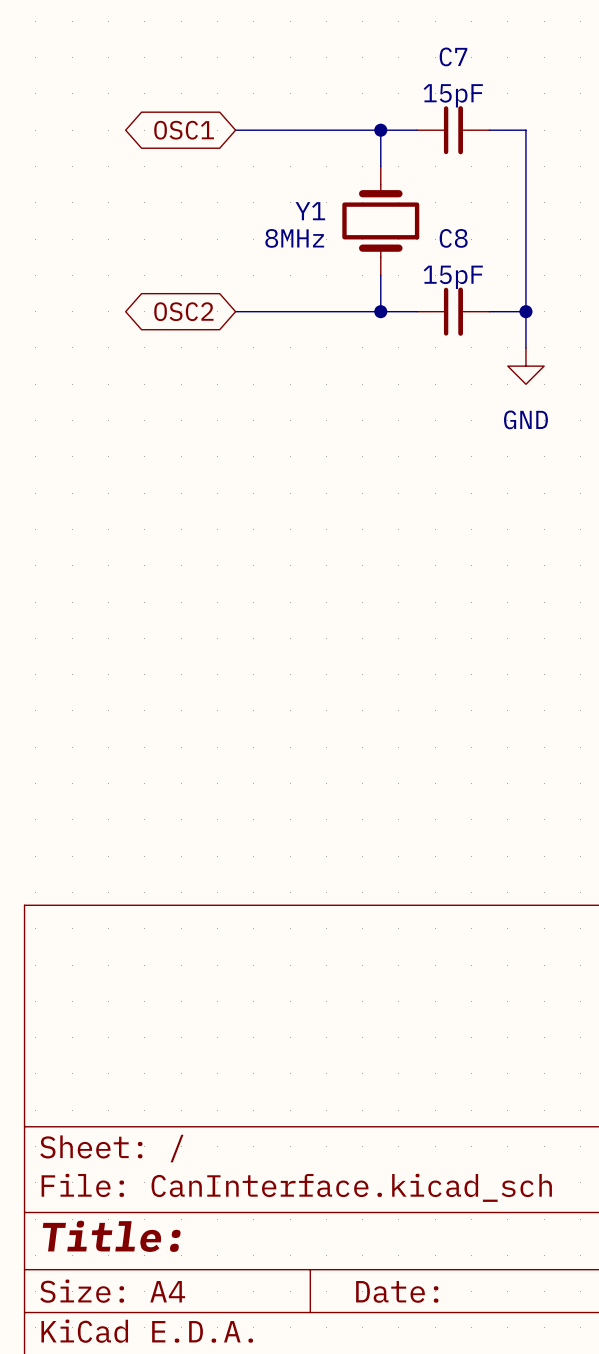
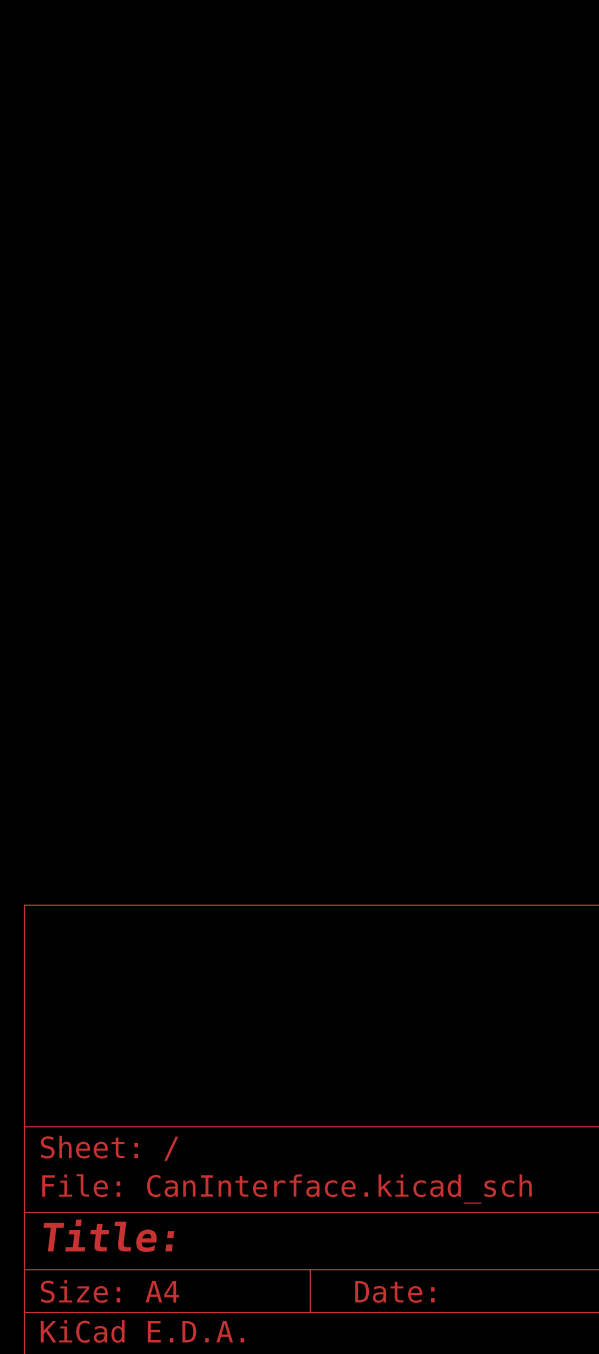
global label: OSC1 (184, 130) -> none
wire: (235, 130) (417, 130) -> none
wire: (380, 130) (380, 166) -> none
junction: (380, 130) -> none
C7: 15pF (453, 130) -> none
wire: (489, 130) (525, 130) (525, 347) -> none
Y1: 8MHz (380, 220) -> none
wire: (380, 275) (380, 311) -> none
global label: OSC2 (183, 311) -> none
wire: (235, 311) (417, 311) -> none
junction: (380, 311) -> none
C8: 15pF (453, 311) -> none
wire: (489, 311) (525, 311) -> none
junction: (525, 311) -> none
power symbol: GND (525, 366) -> none

